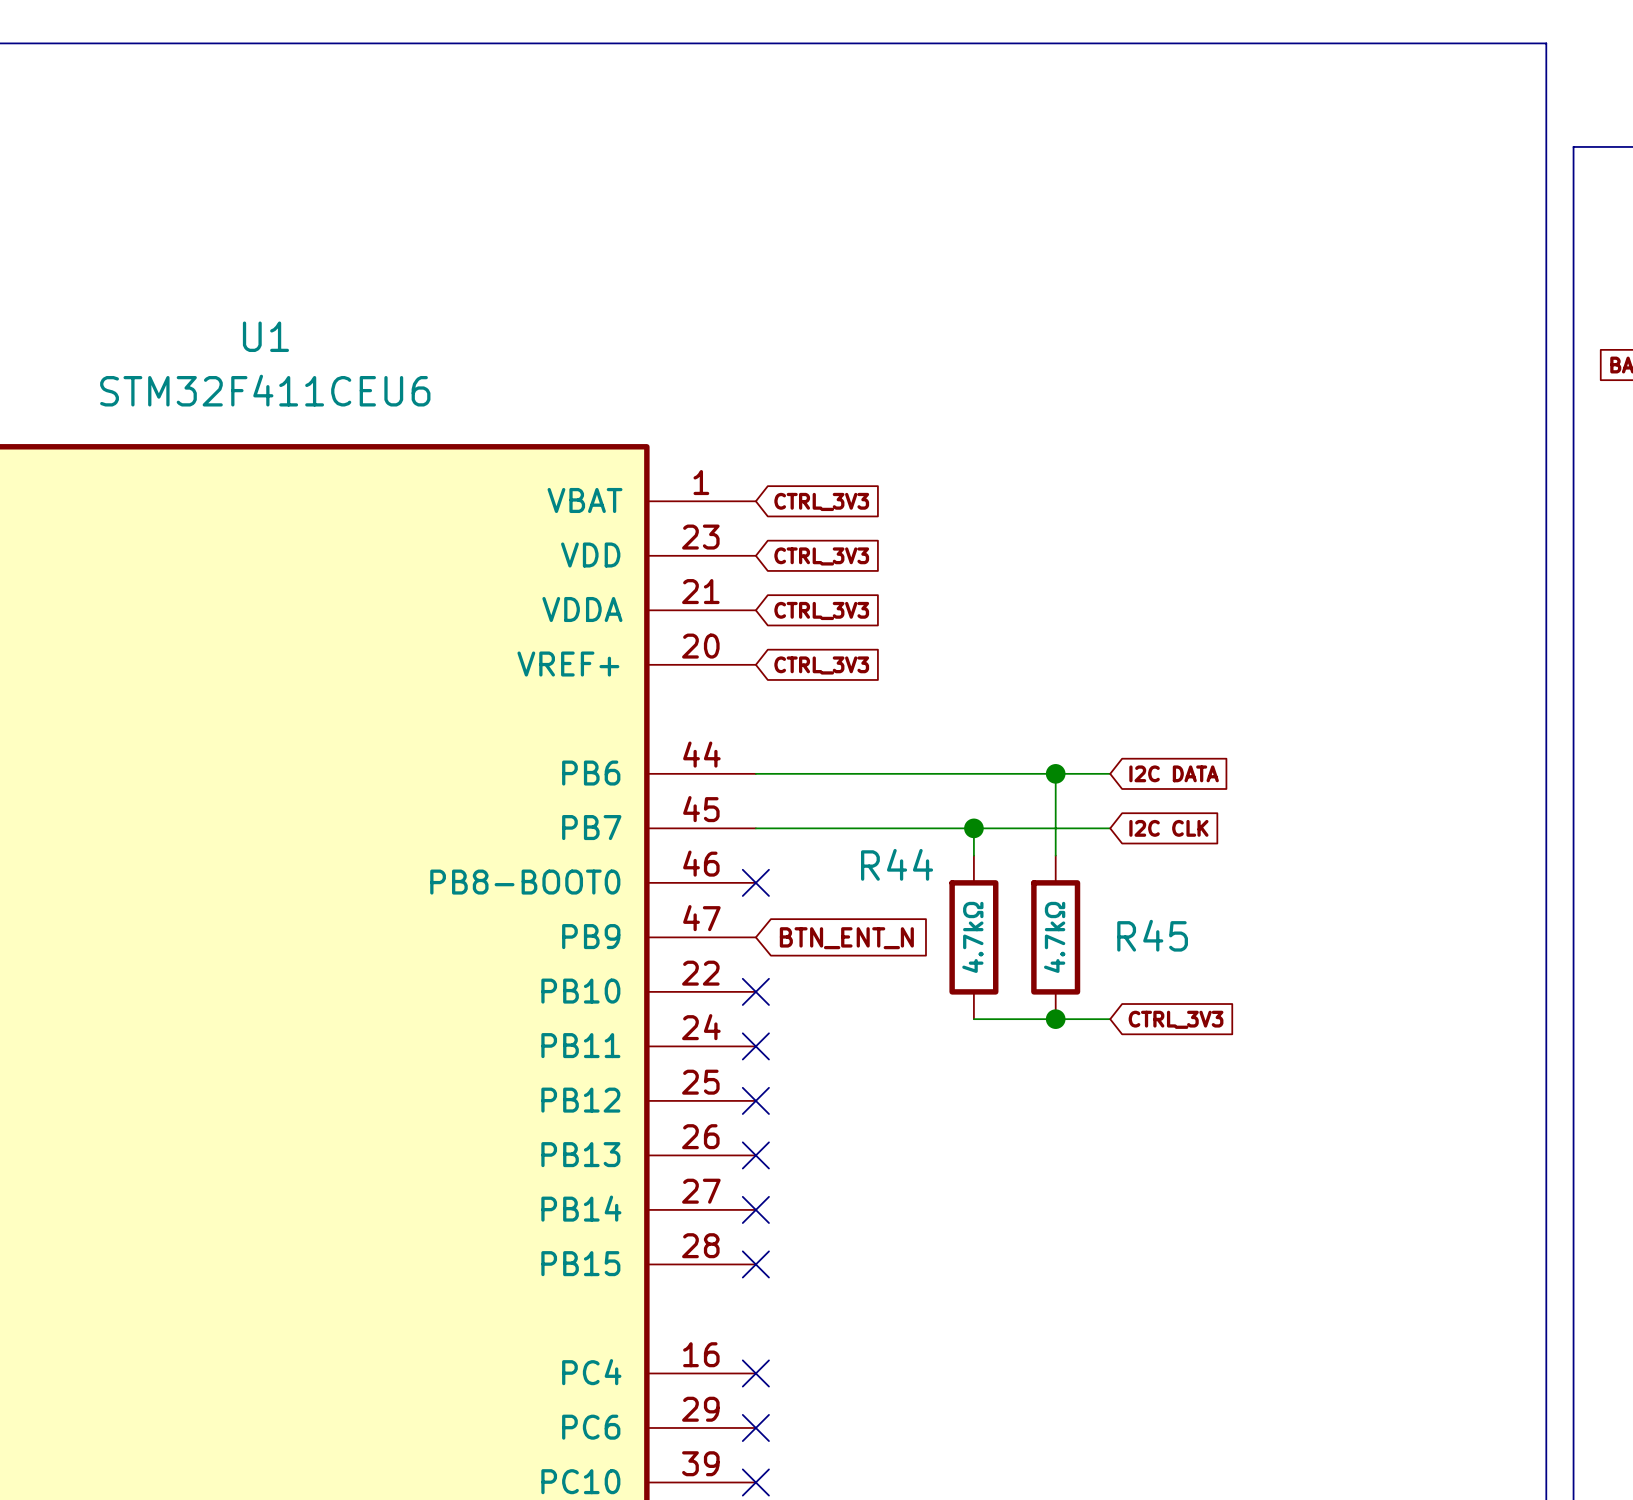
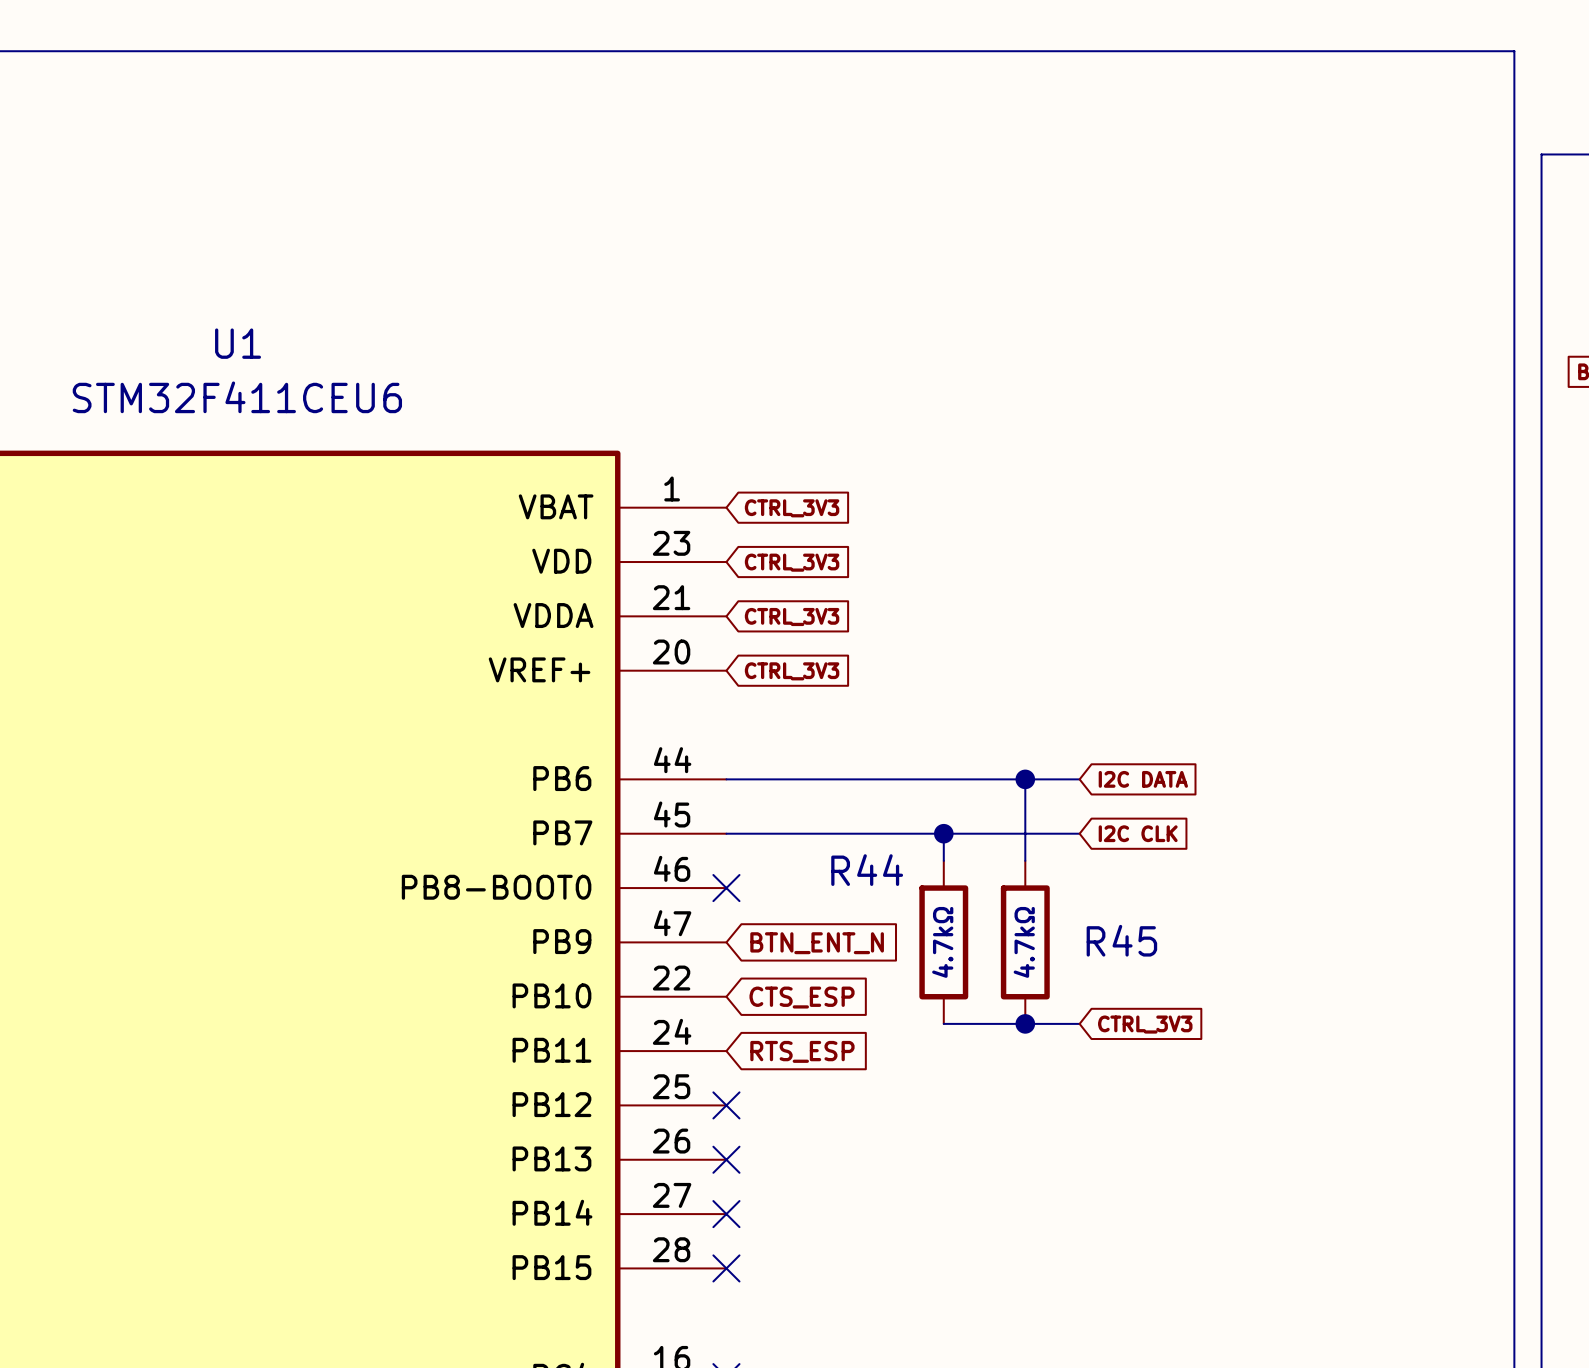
no-connect mark: (755, 991) -> none
global label: none -> CTS_ESP (802, 997)
no-connect mark: (755, 1046) -> none
global label: none -> RTS_ESP (802, 1051)

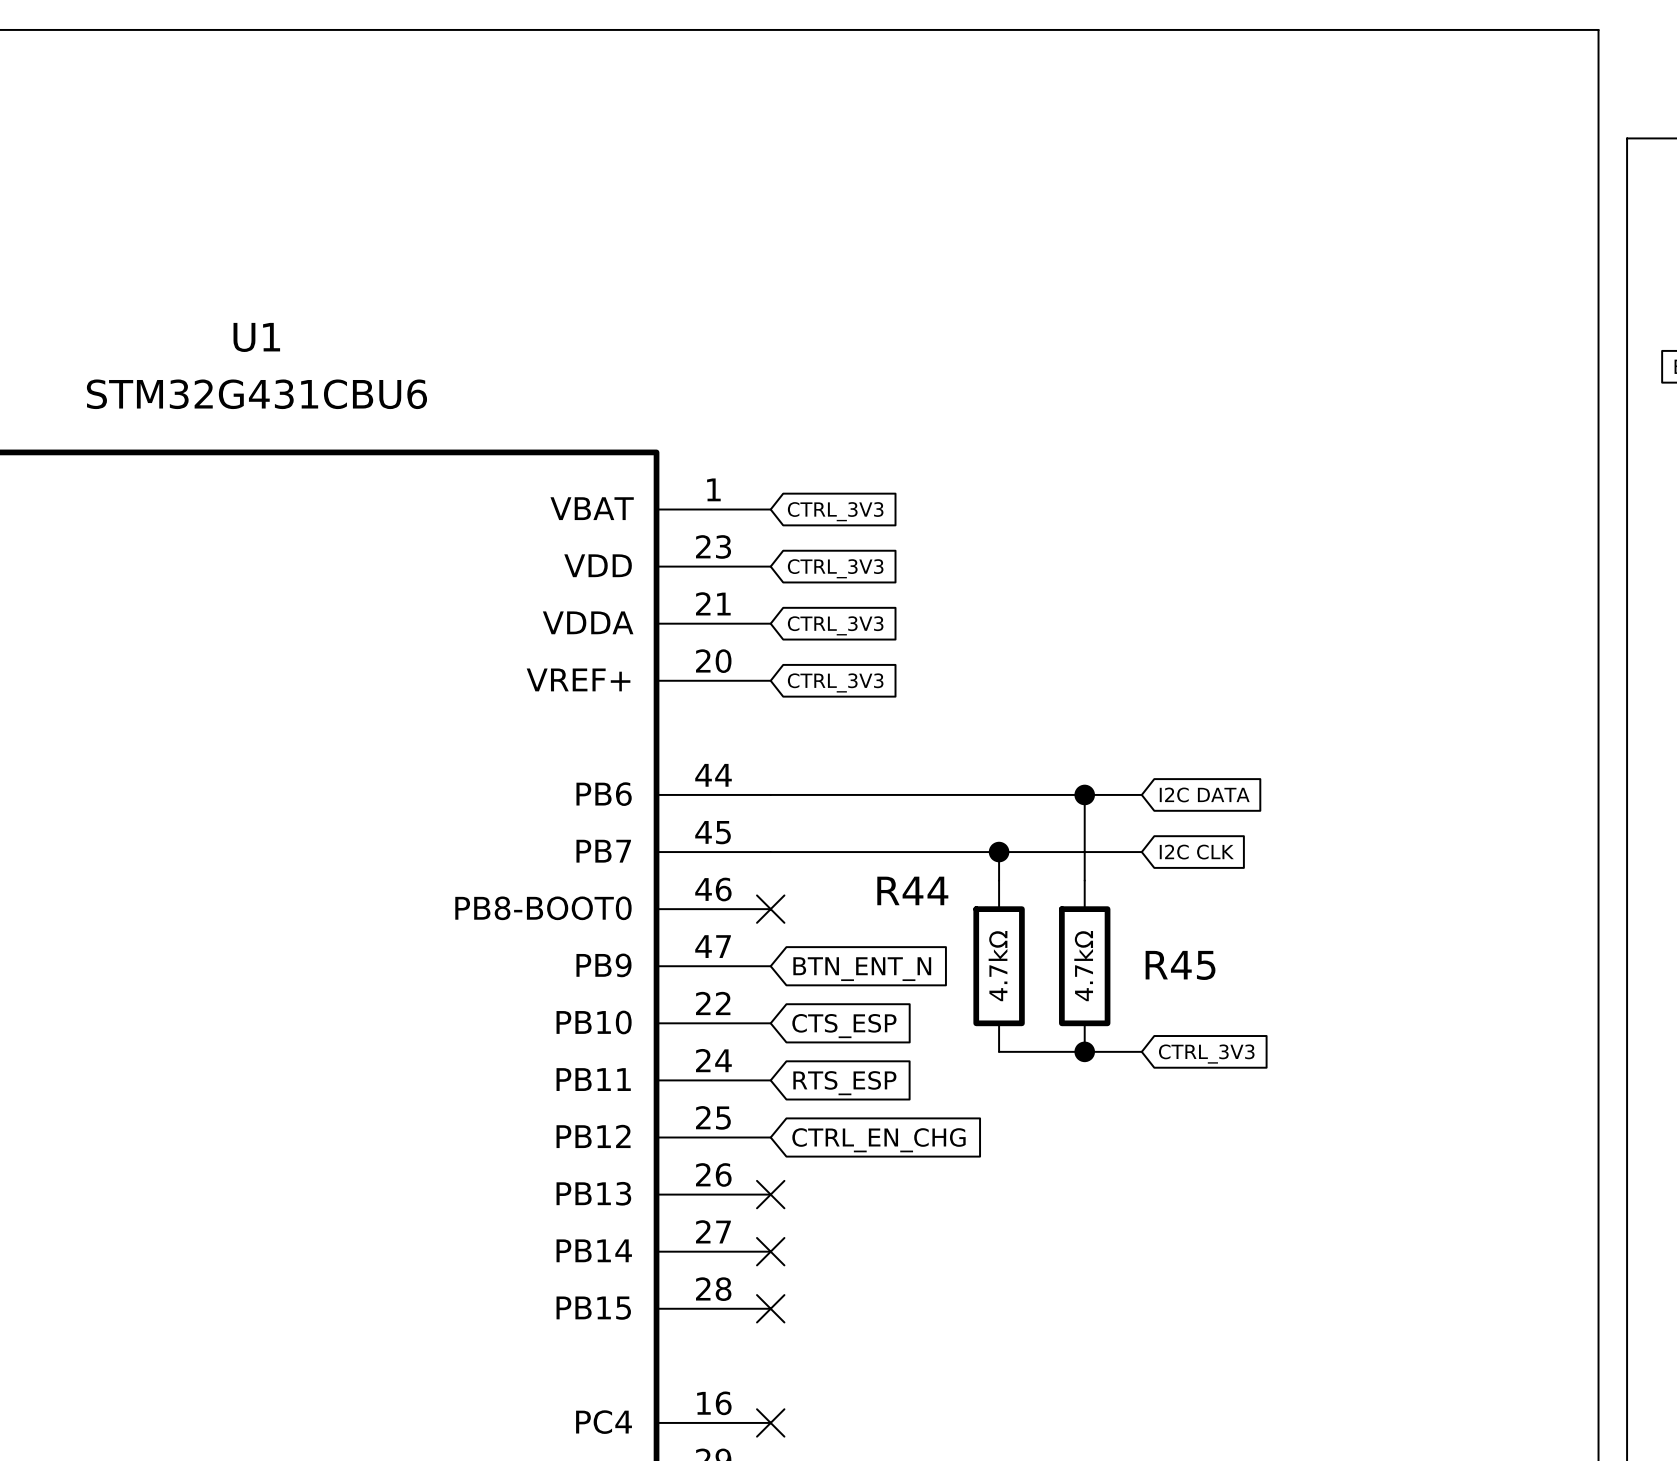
U1 value: STM32F411CEU6 (237, 397) -> STM32G431CBU6 (256, 394)
no-connect mark: (726, 1105) -> none
global label: none -> CTRL_EN_CHG (878, 1140)

